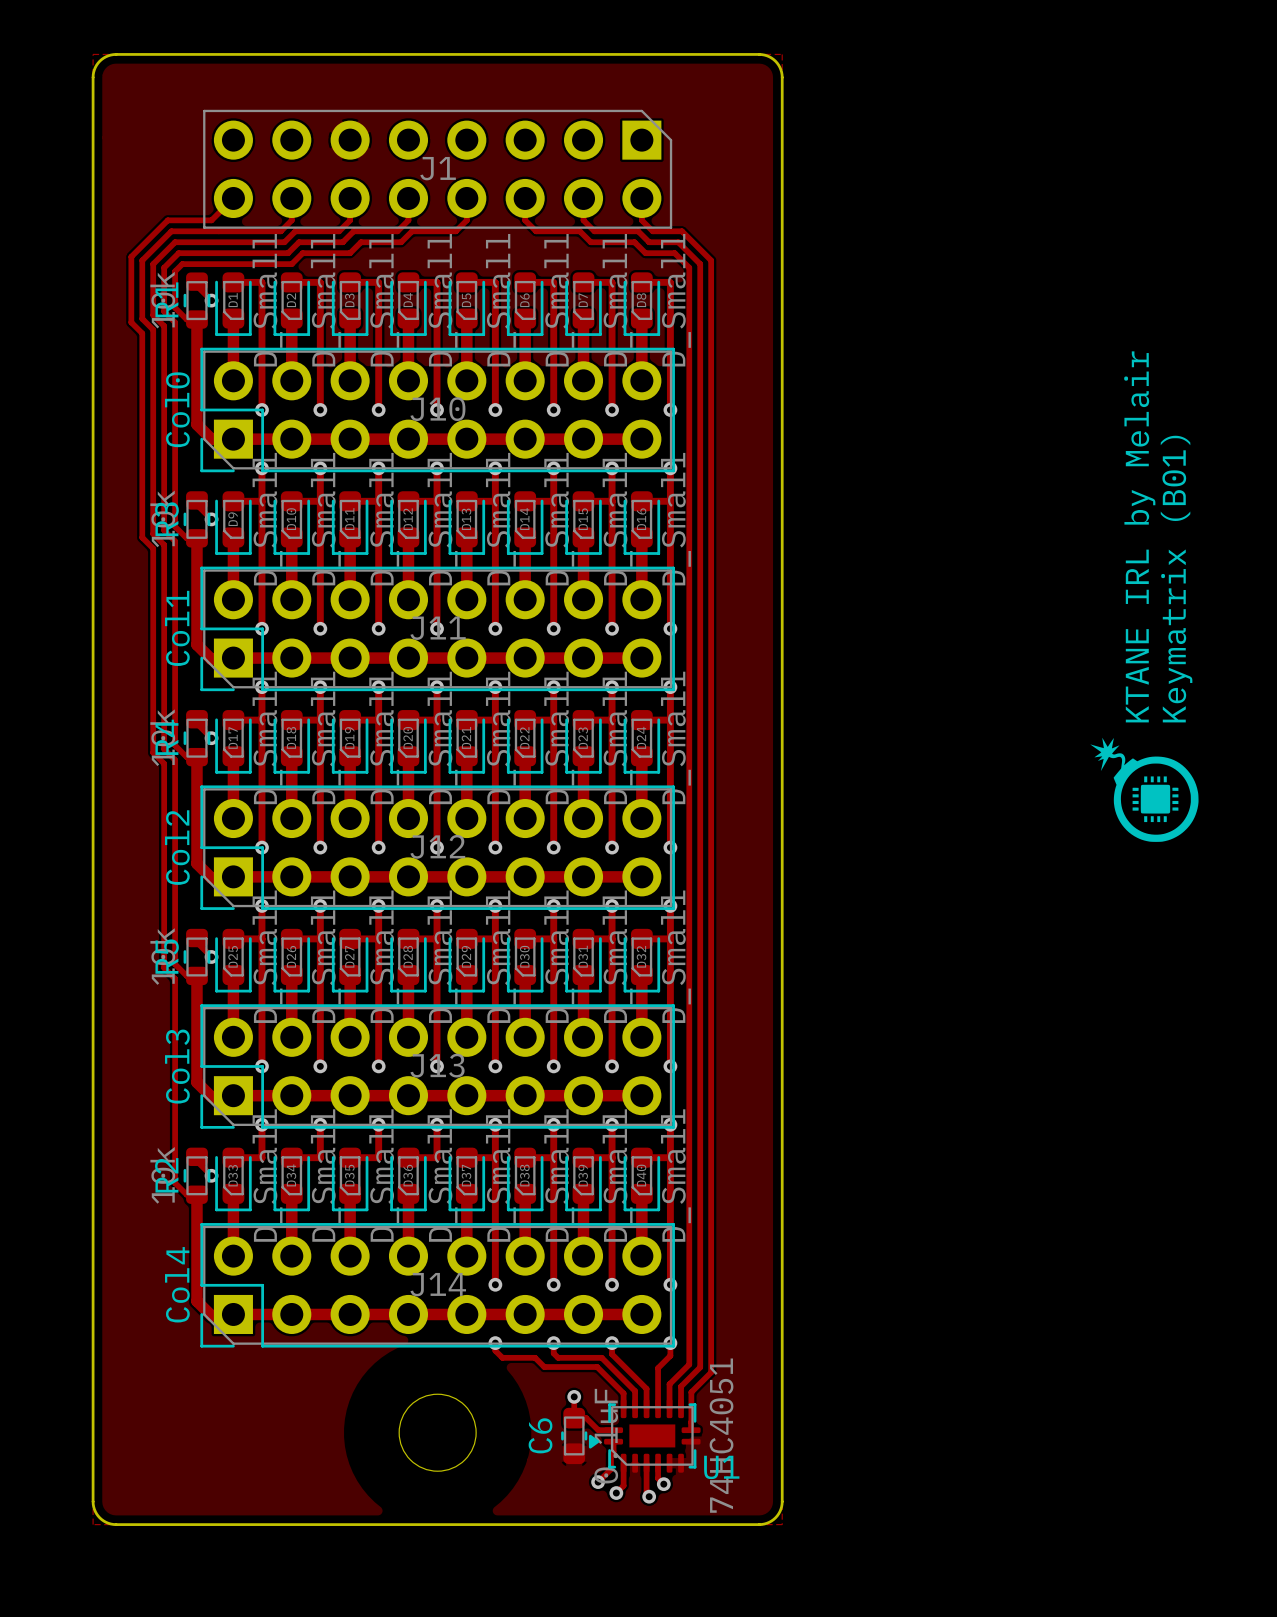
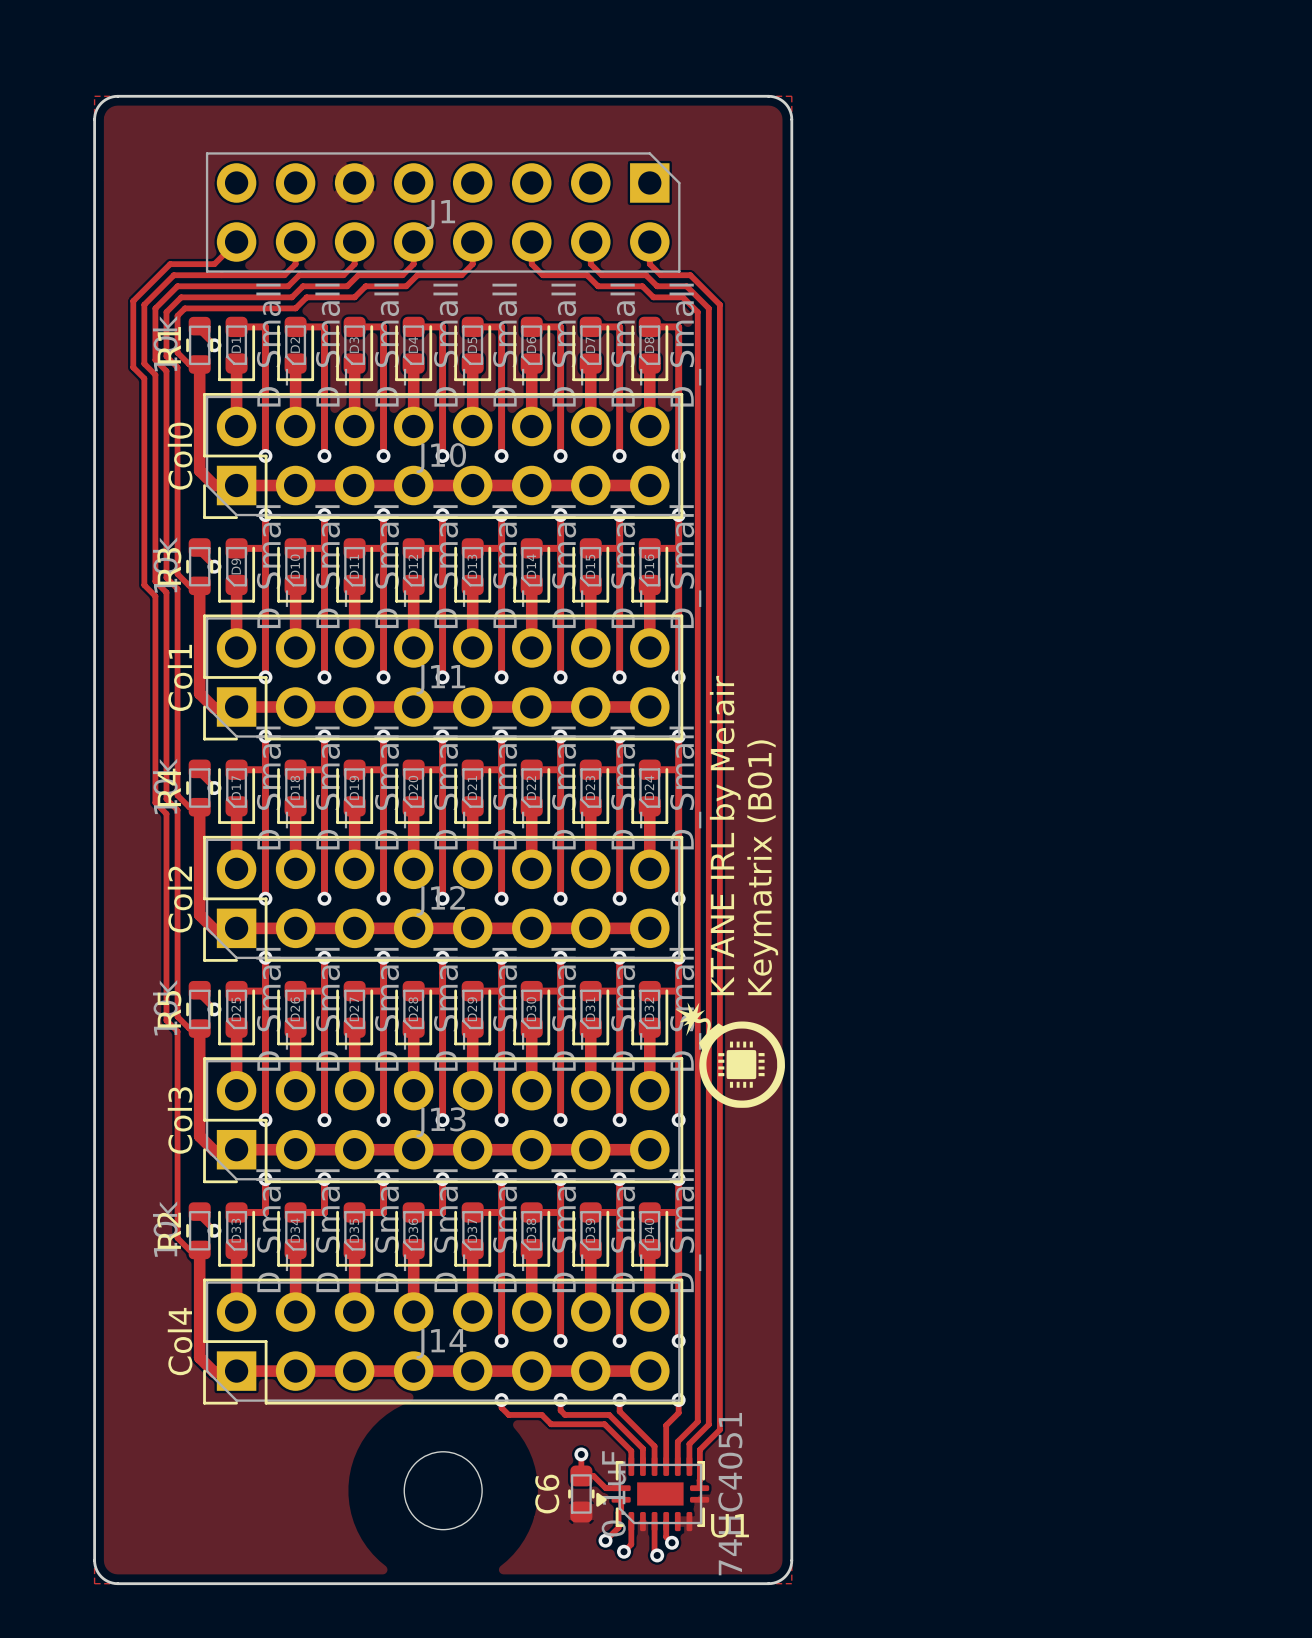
text position: KTANE IRL by Melair (1139, 536) -> KTANE IRL by Melair (725, 835)
text position: Keymatrix (B01) (1176, 579) -> Keymatrix (B01) (762, 867)
drawing position: (1144, 789) -> (730, 1055)

